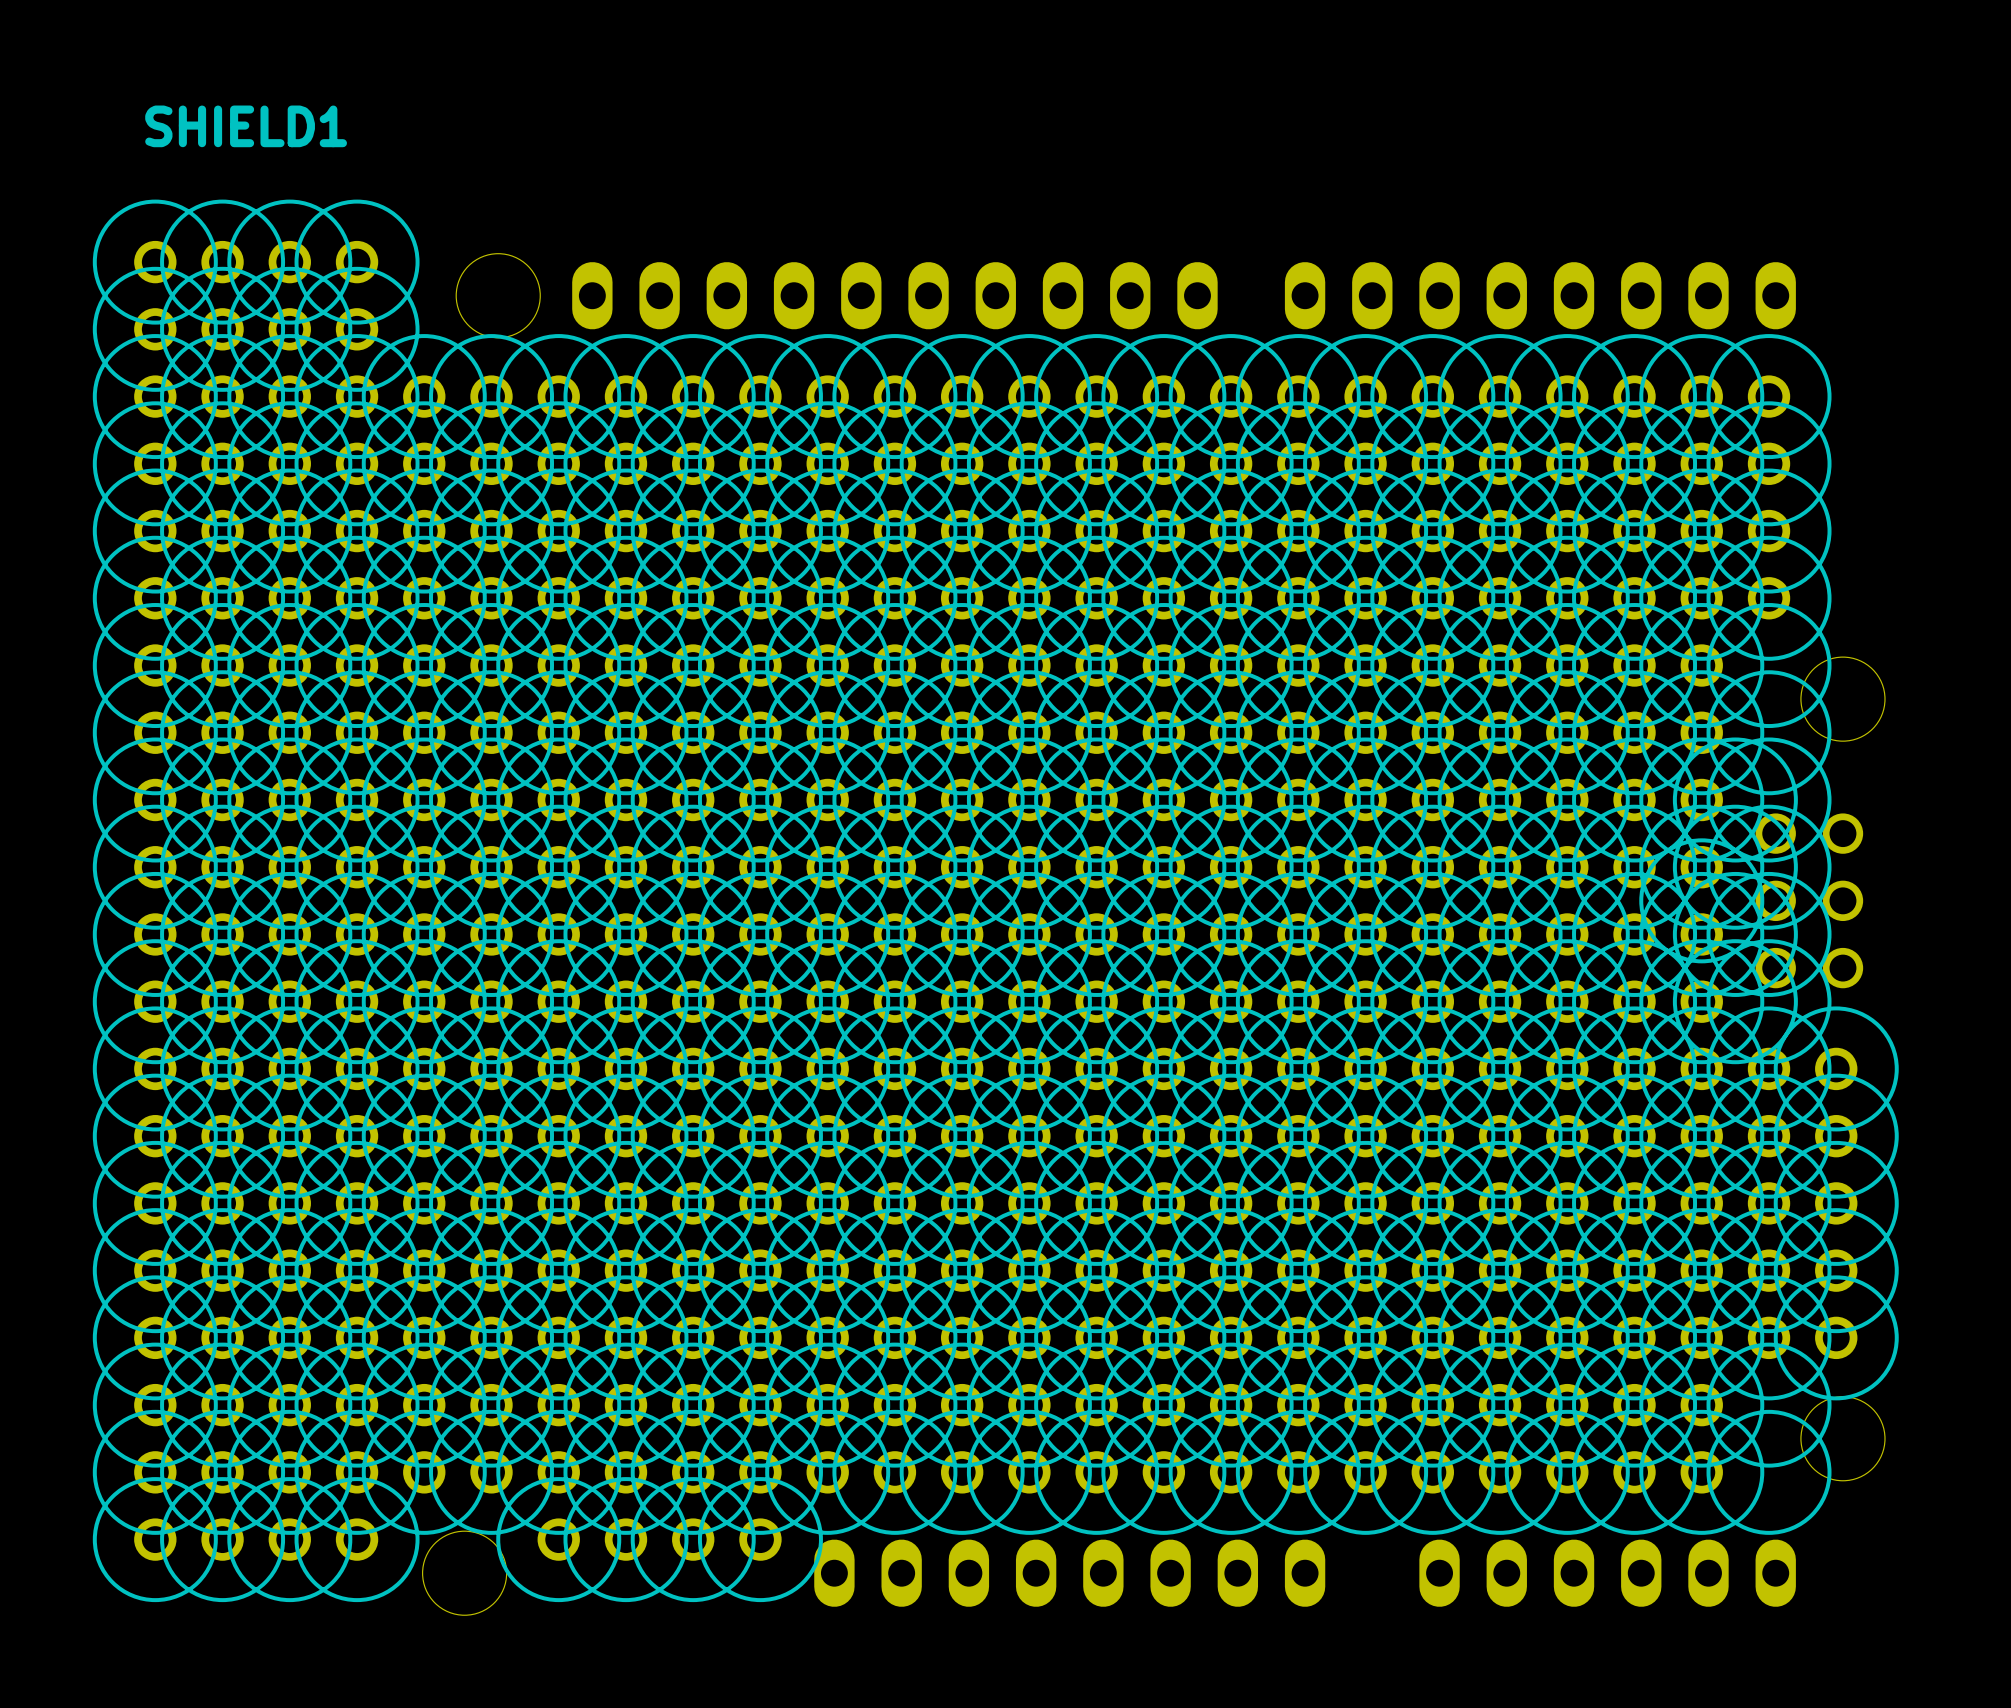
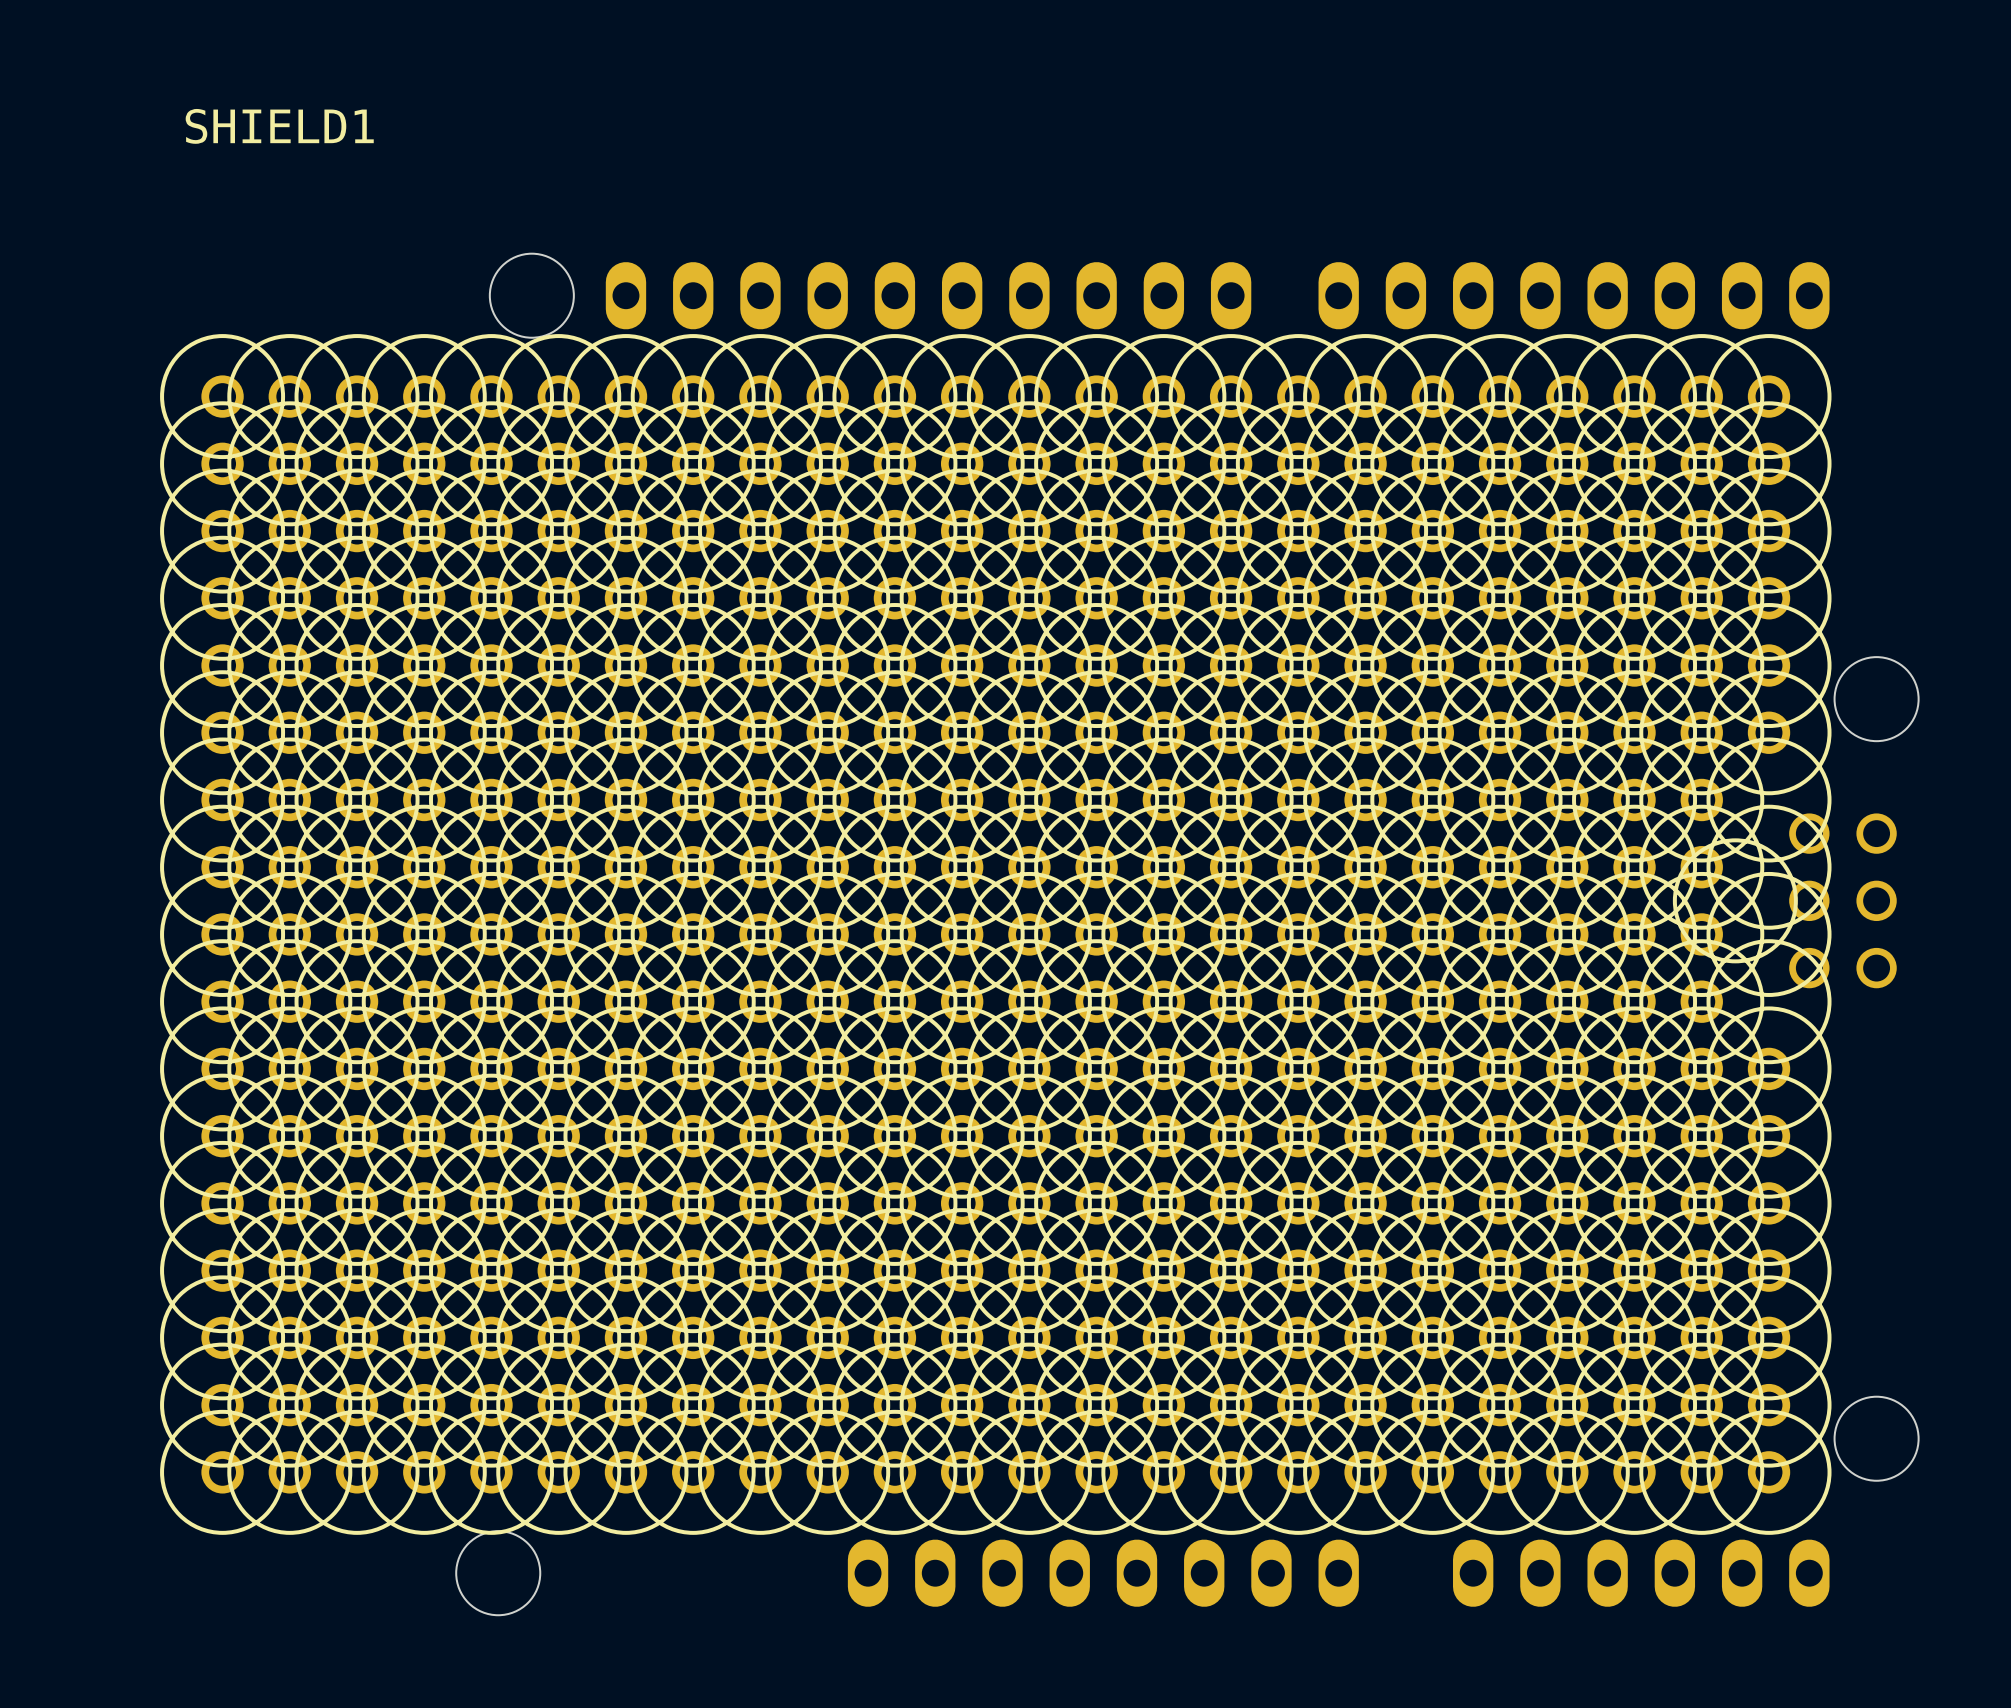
part: (155, 262) -> none
part: (222, 262) -> none
part: (289, 262) -> none
part: (357, 262) -> none
part: (155, 329) -> none
part: (222, 329) -> none
part: (289, 329) -> none
part: (357, 329) -> none
part: (155, 396) -> none
part: (155, 463) -> none
part: (155, 531) -> none
part: (155, 598) -> none
drawing: [1639, 603, 1832, 1065] -> none
part: (155, 665) -> none
part: none -> (1769, 665)
part: (155, 732) -> none
part: none -> (1769, 732)
part: (155, 799) -> none
drawing: none -> [1672, 838, 1798, 964]
part: (155, 867) -> none
part: (155, 934) -> none
SHIELD1 position: (1153, 934) -> (1187, 934)
part: (155, 1001) -> none
part: (155, 1068) -> none
part: (1836, 1068) -> none
part: (155, 1136) -> none
part: (1836, 1136) -> none
part: (155, 1203) -> none
part: (1836, 1203) -> none
part: (155, 1270) -> none
part: (1836, 1270) -> none
part: (155, 1337) -> none
part: (1836, 1337) -> none
drawing: [1706, 1342, 1832, 1535] -> none
part: (155, 1405) -> none
part: none -> (1769, 1405)
part: (155, 1472) -> none
part: none -> (1769, 1472)
part: (155, 1539) -> none
part: (222, 1539) -> none
part: (289, 1539) -> none
part: (357, 1539) -> none
part: (558, 1539) -> none
part: (625, 1539) -> none
part: (693, 1539) -> none
part: (760, 1539) -> none

